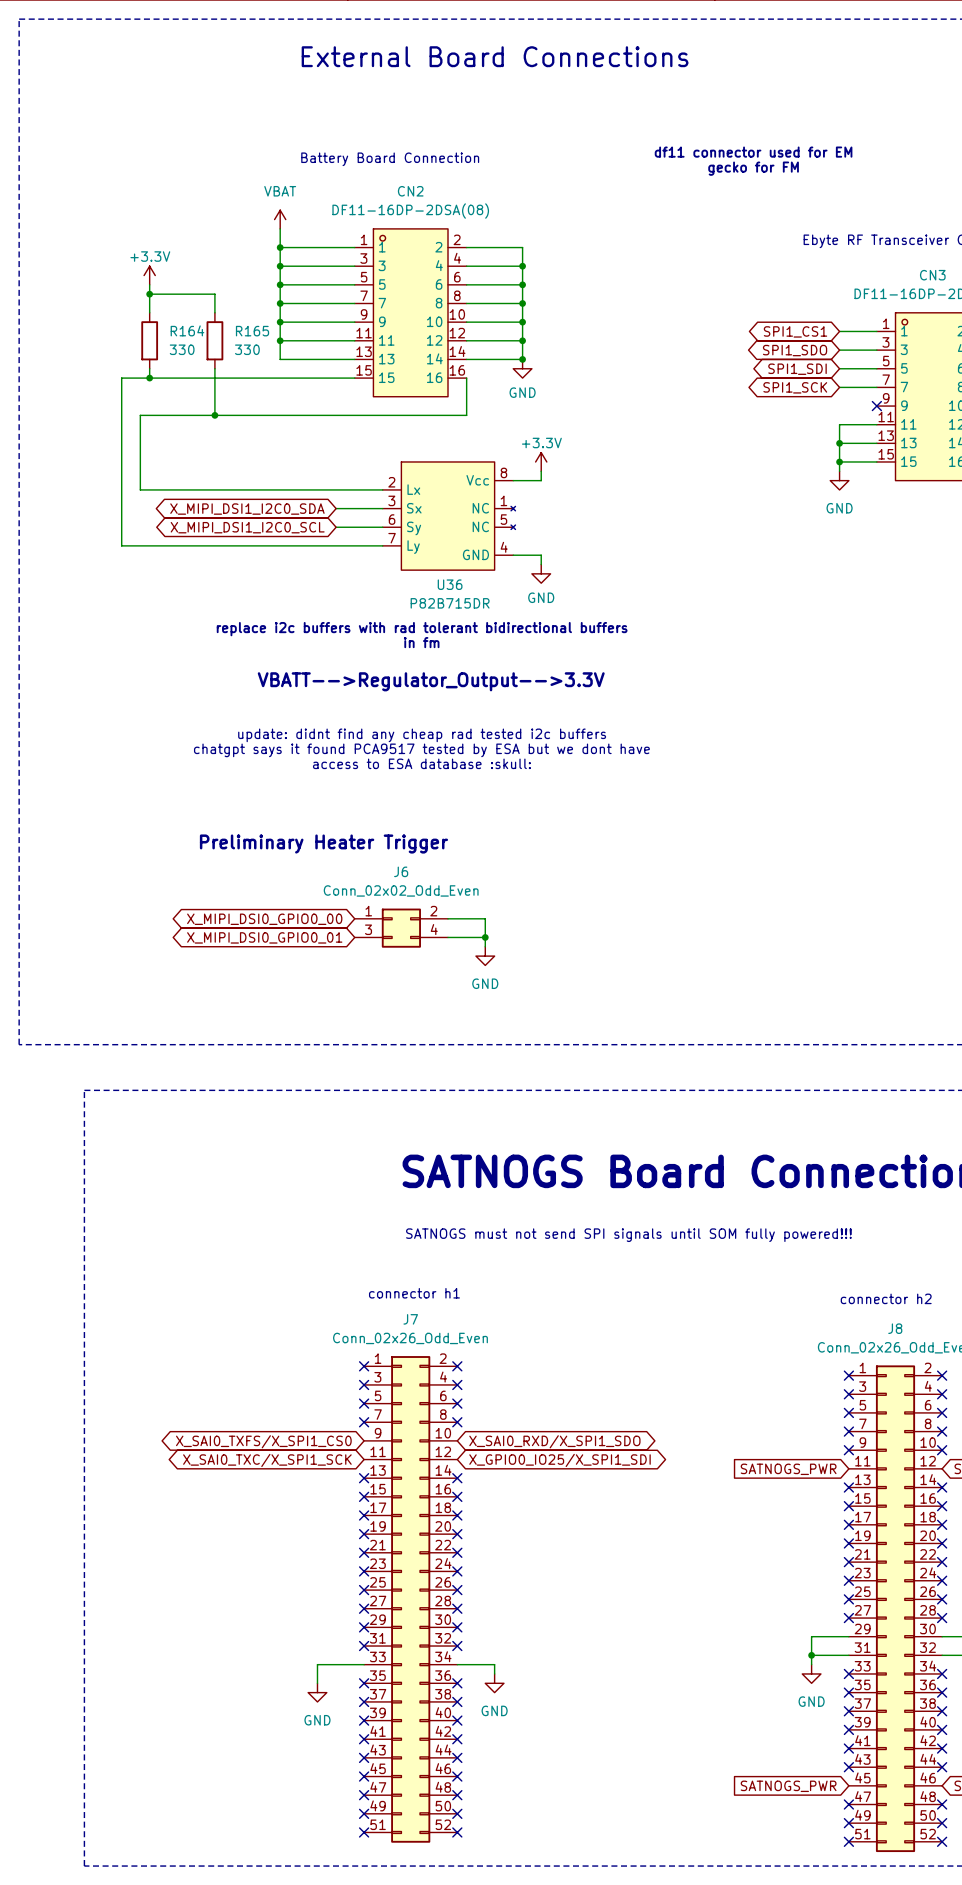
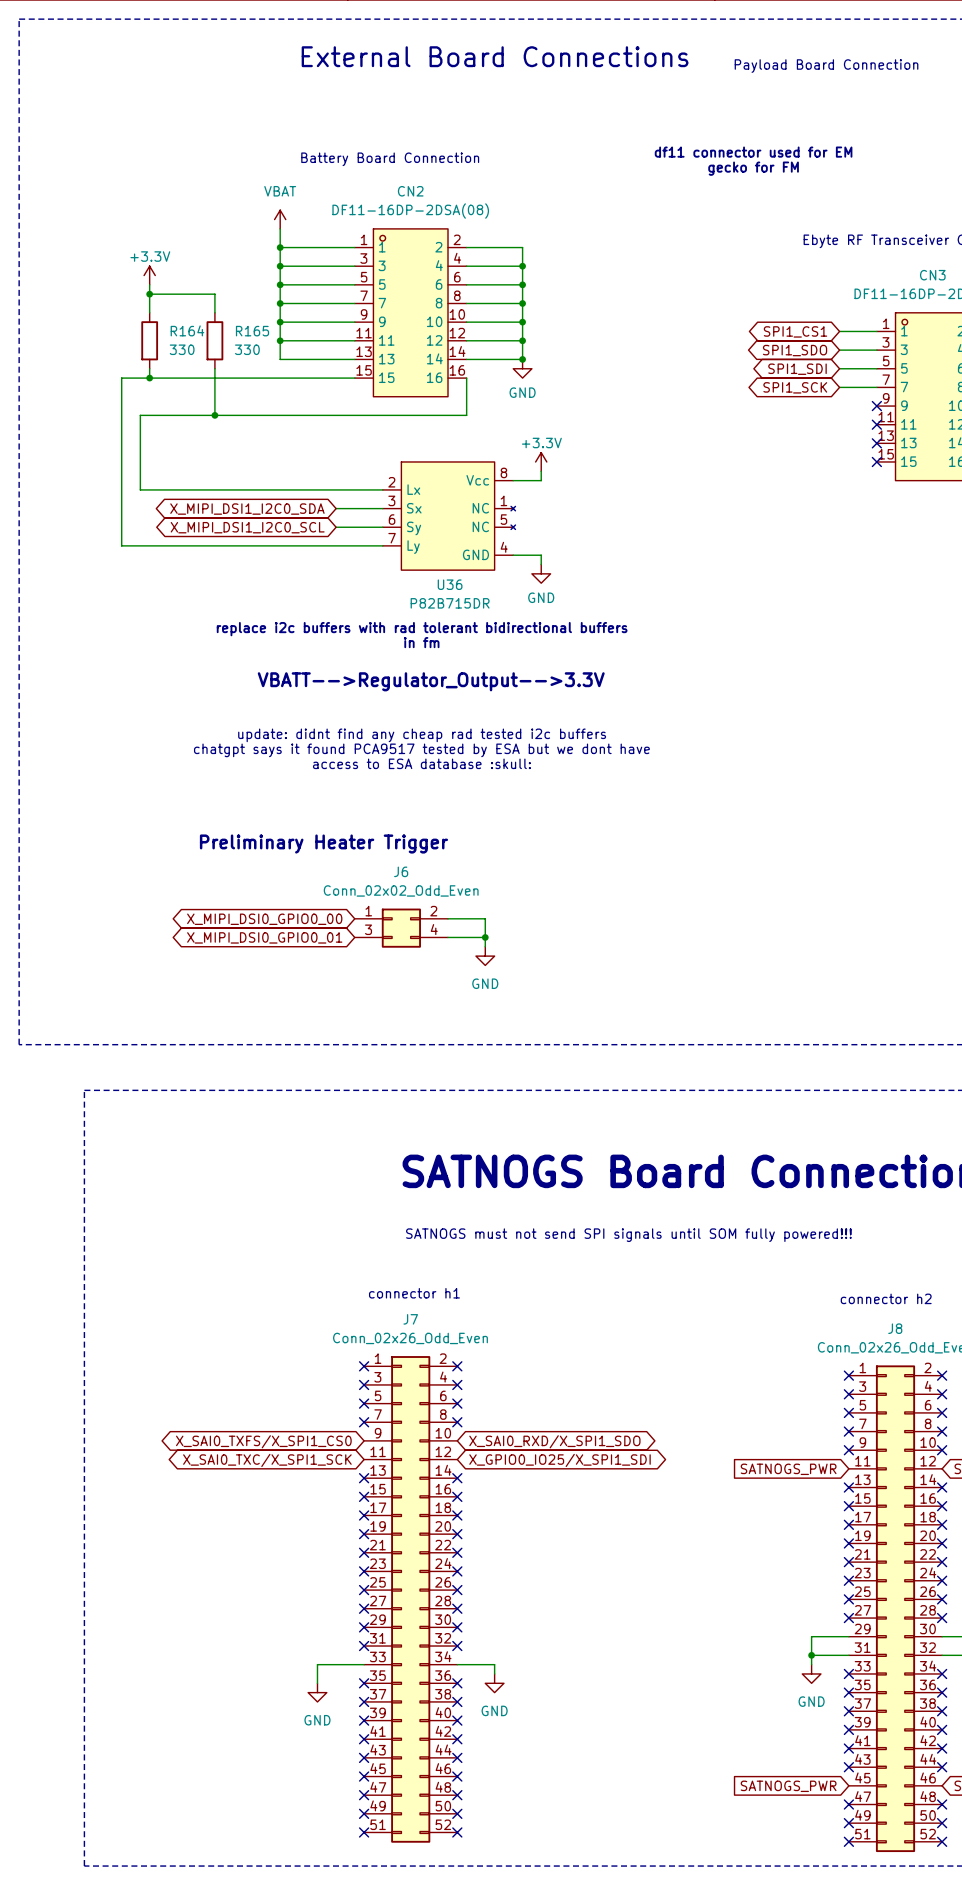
text: none -> Payload Board Connection (826, 66)
wire: (876, 424) (839, 424) (839, 471) -> none
no-connect mark: none -> (876, 424)
wire: (839, 443) (876, 443) -> none
junction: (839, 443) -> none
no-connect mark: none -> (876, 443)
wire: (839, 461) (876, 461) -> none
junction: (839, 461) -> none
no-connect mark: none -> (876, 461)
power symbol: GND (839, 480) -> none

